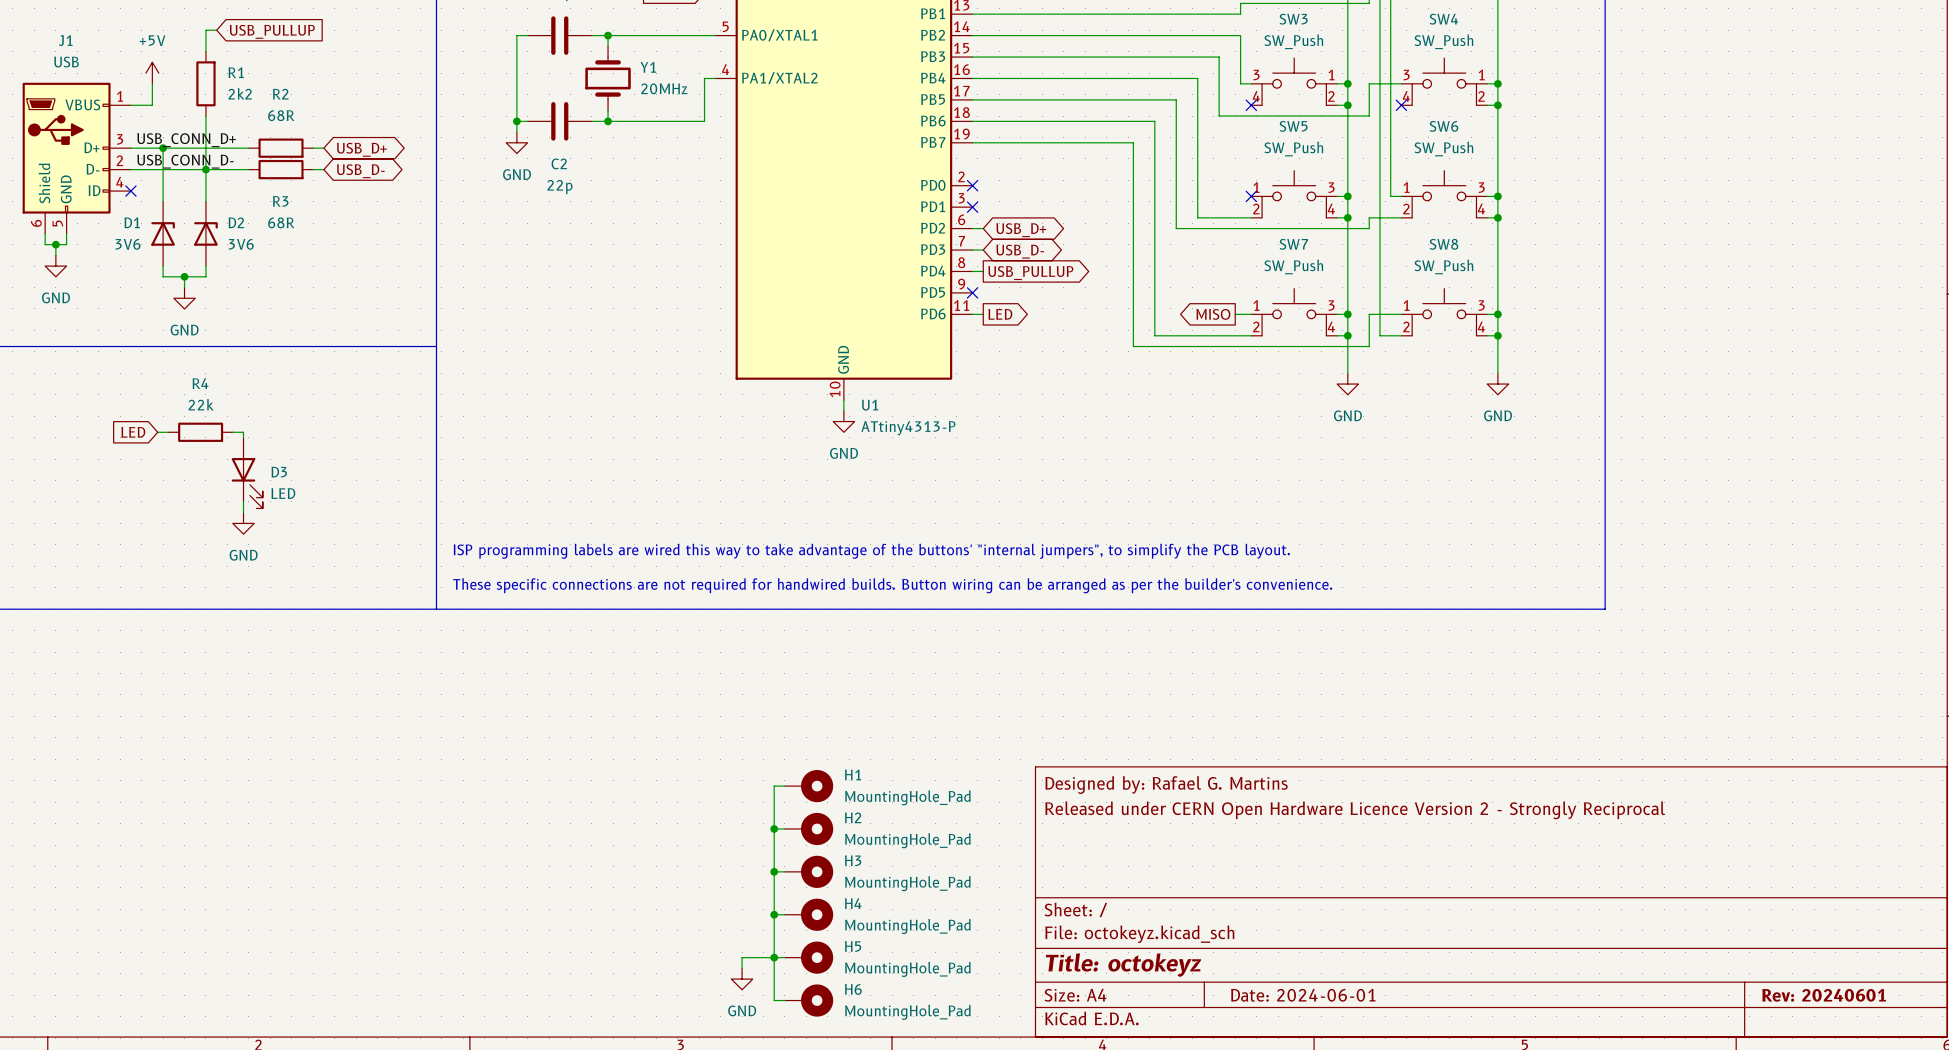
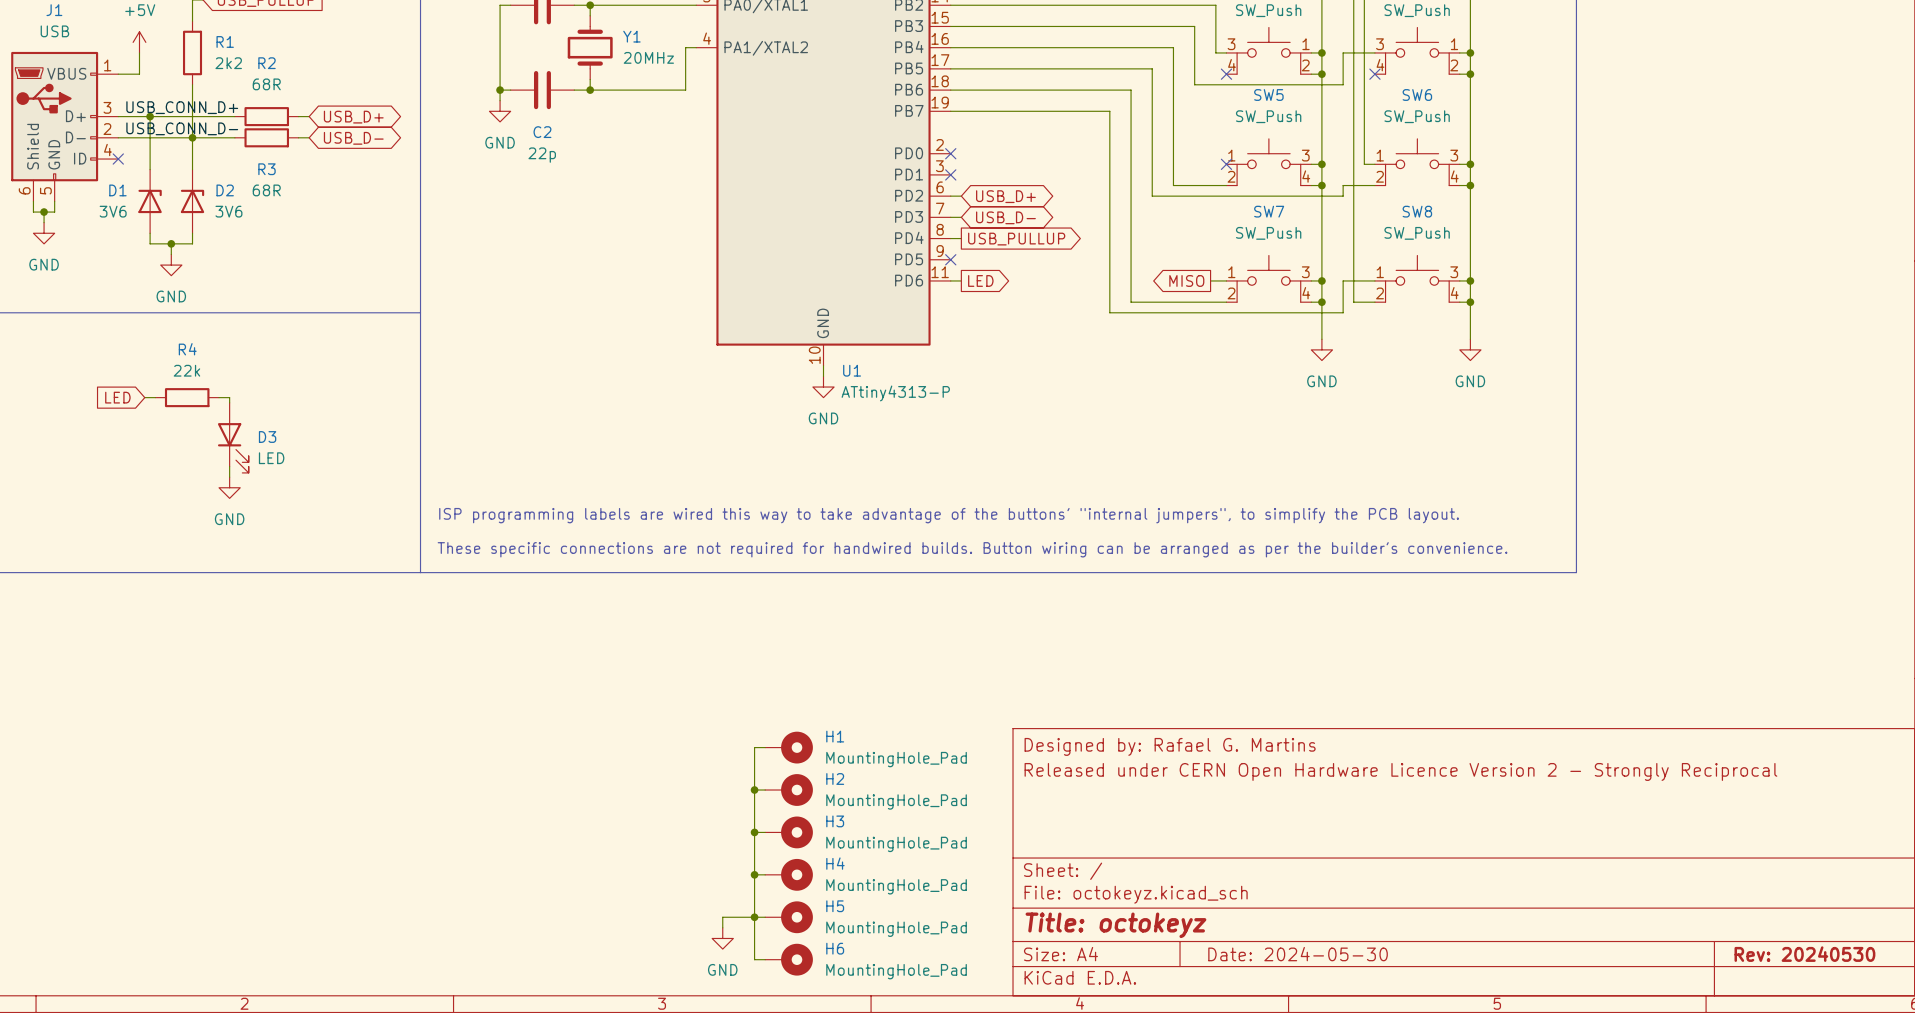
title block: Date: 2024-06-01 (1303, 995) -> Date: 2024-05-30 (1298, 954)
title block: Rev: 20240601 (1824, 995) -> Rev: 20240530 (1804, 954)

